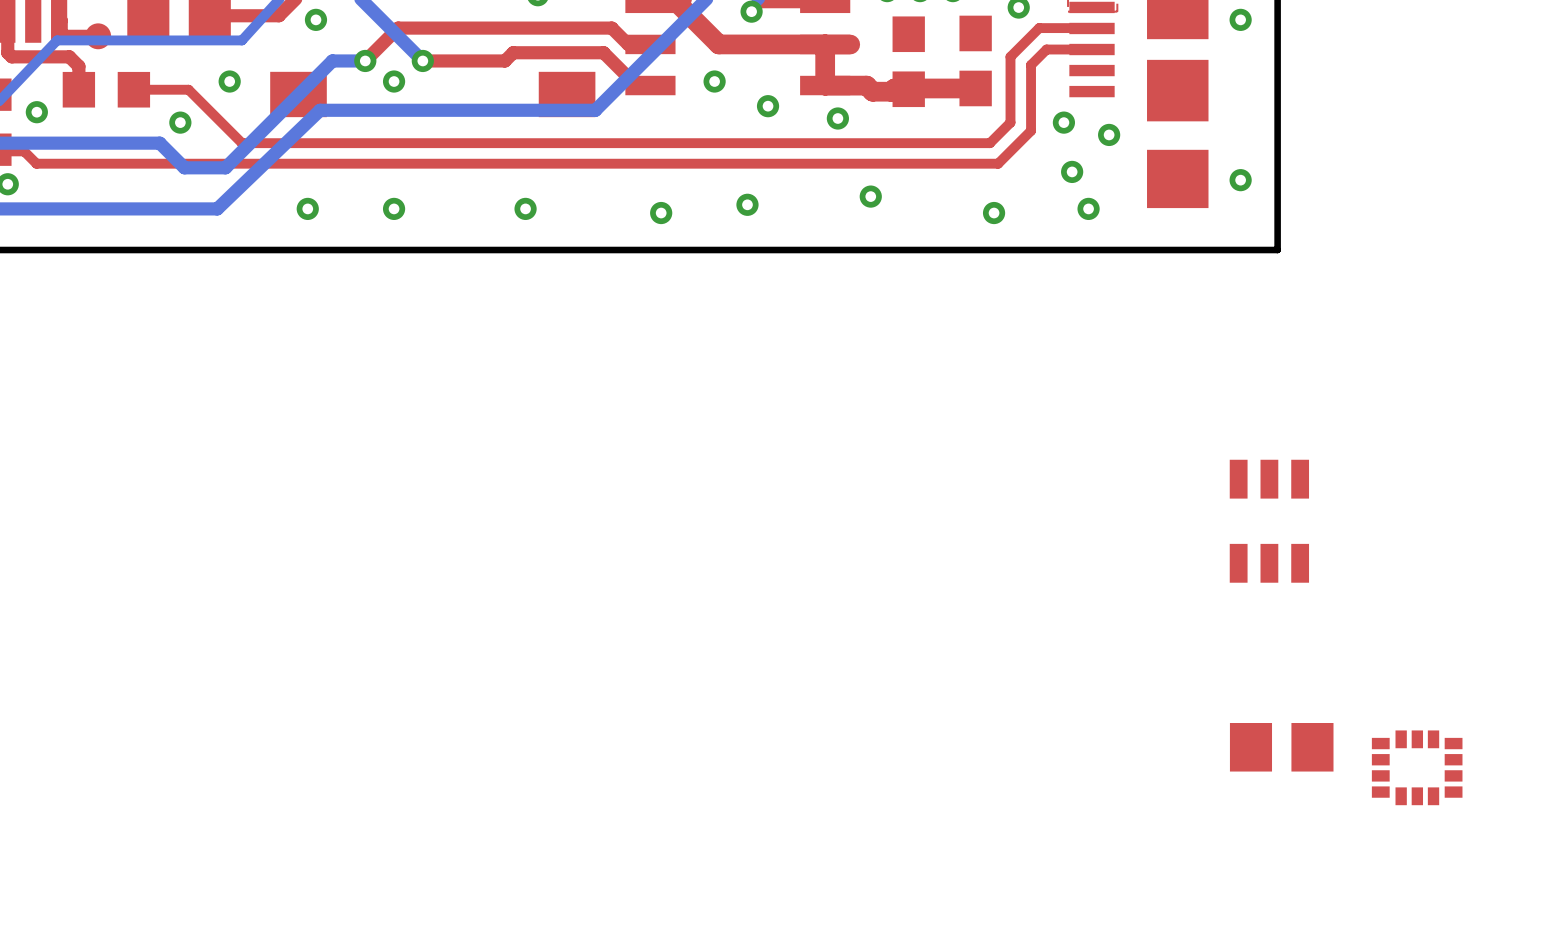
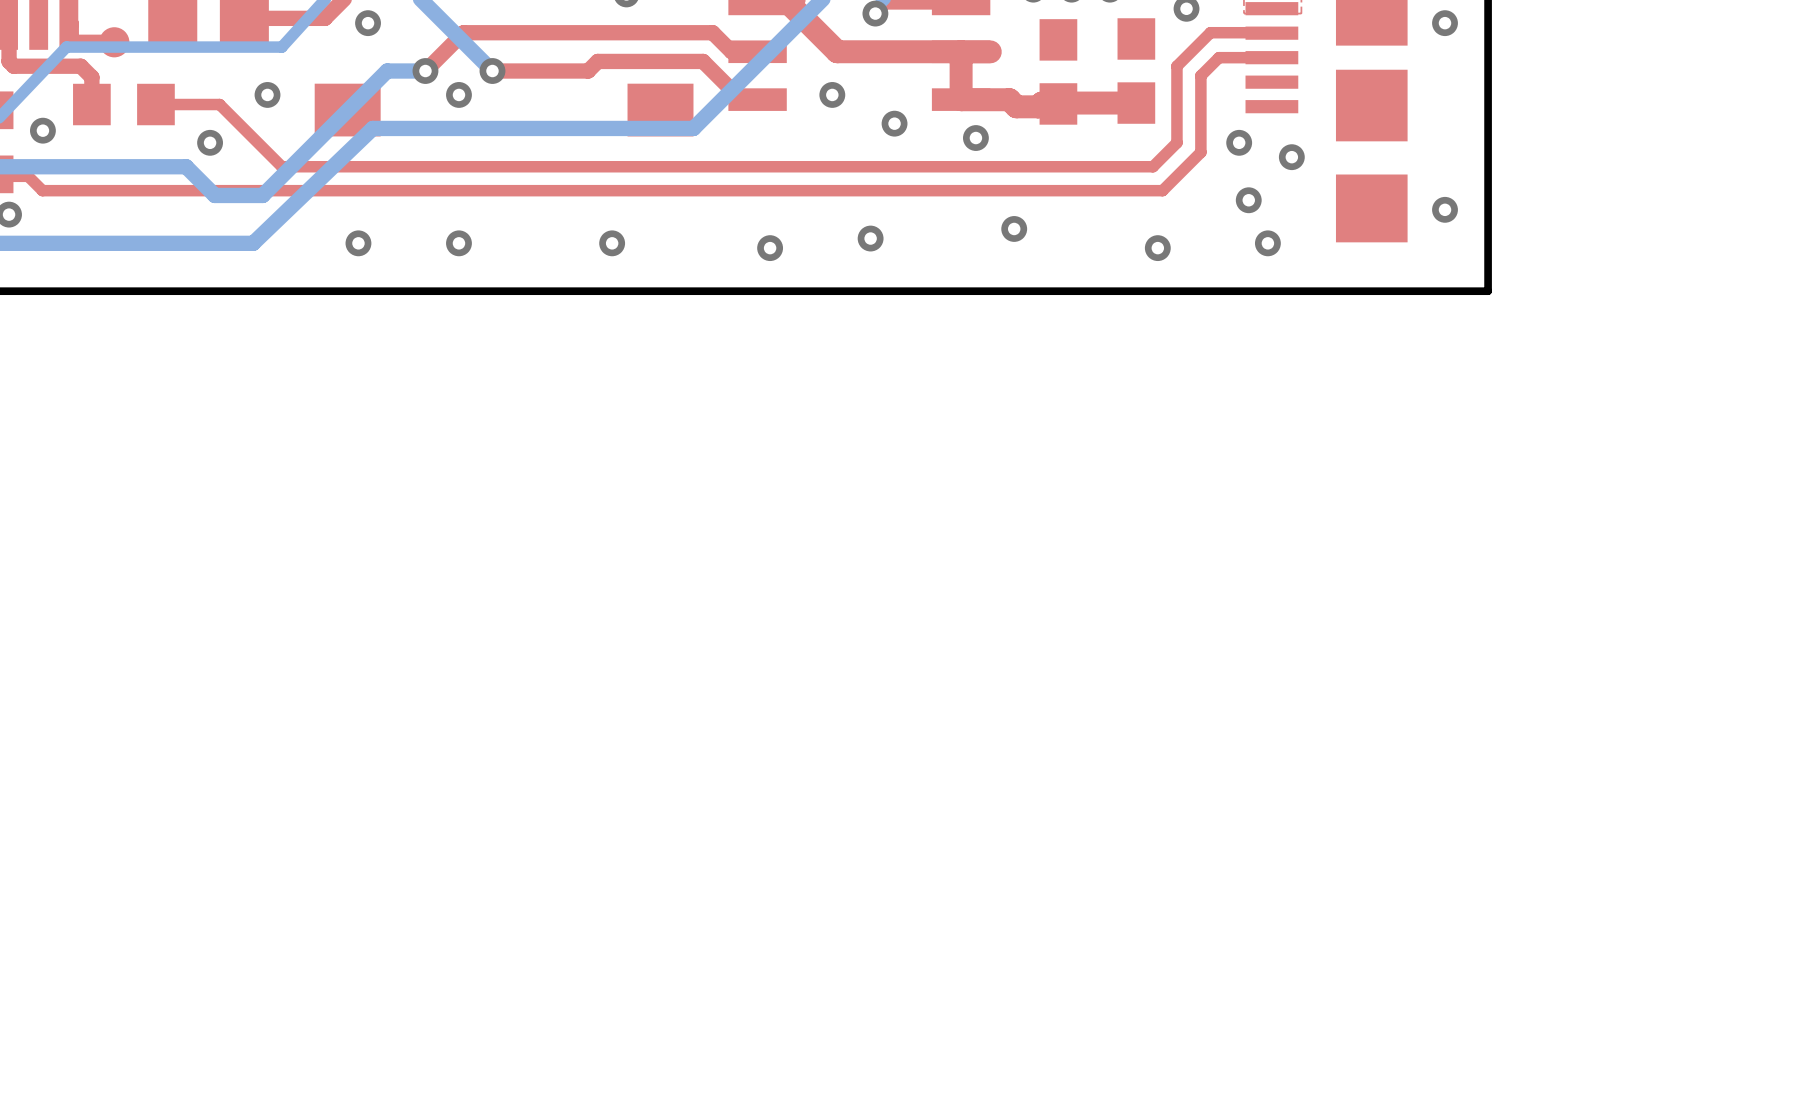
part: (1269, 521) -> none
part: (1281, 747) -> none
part: (1417, 767) -> none

